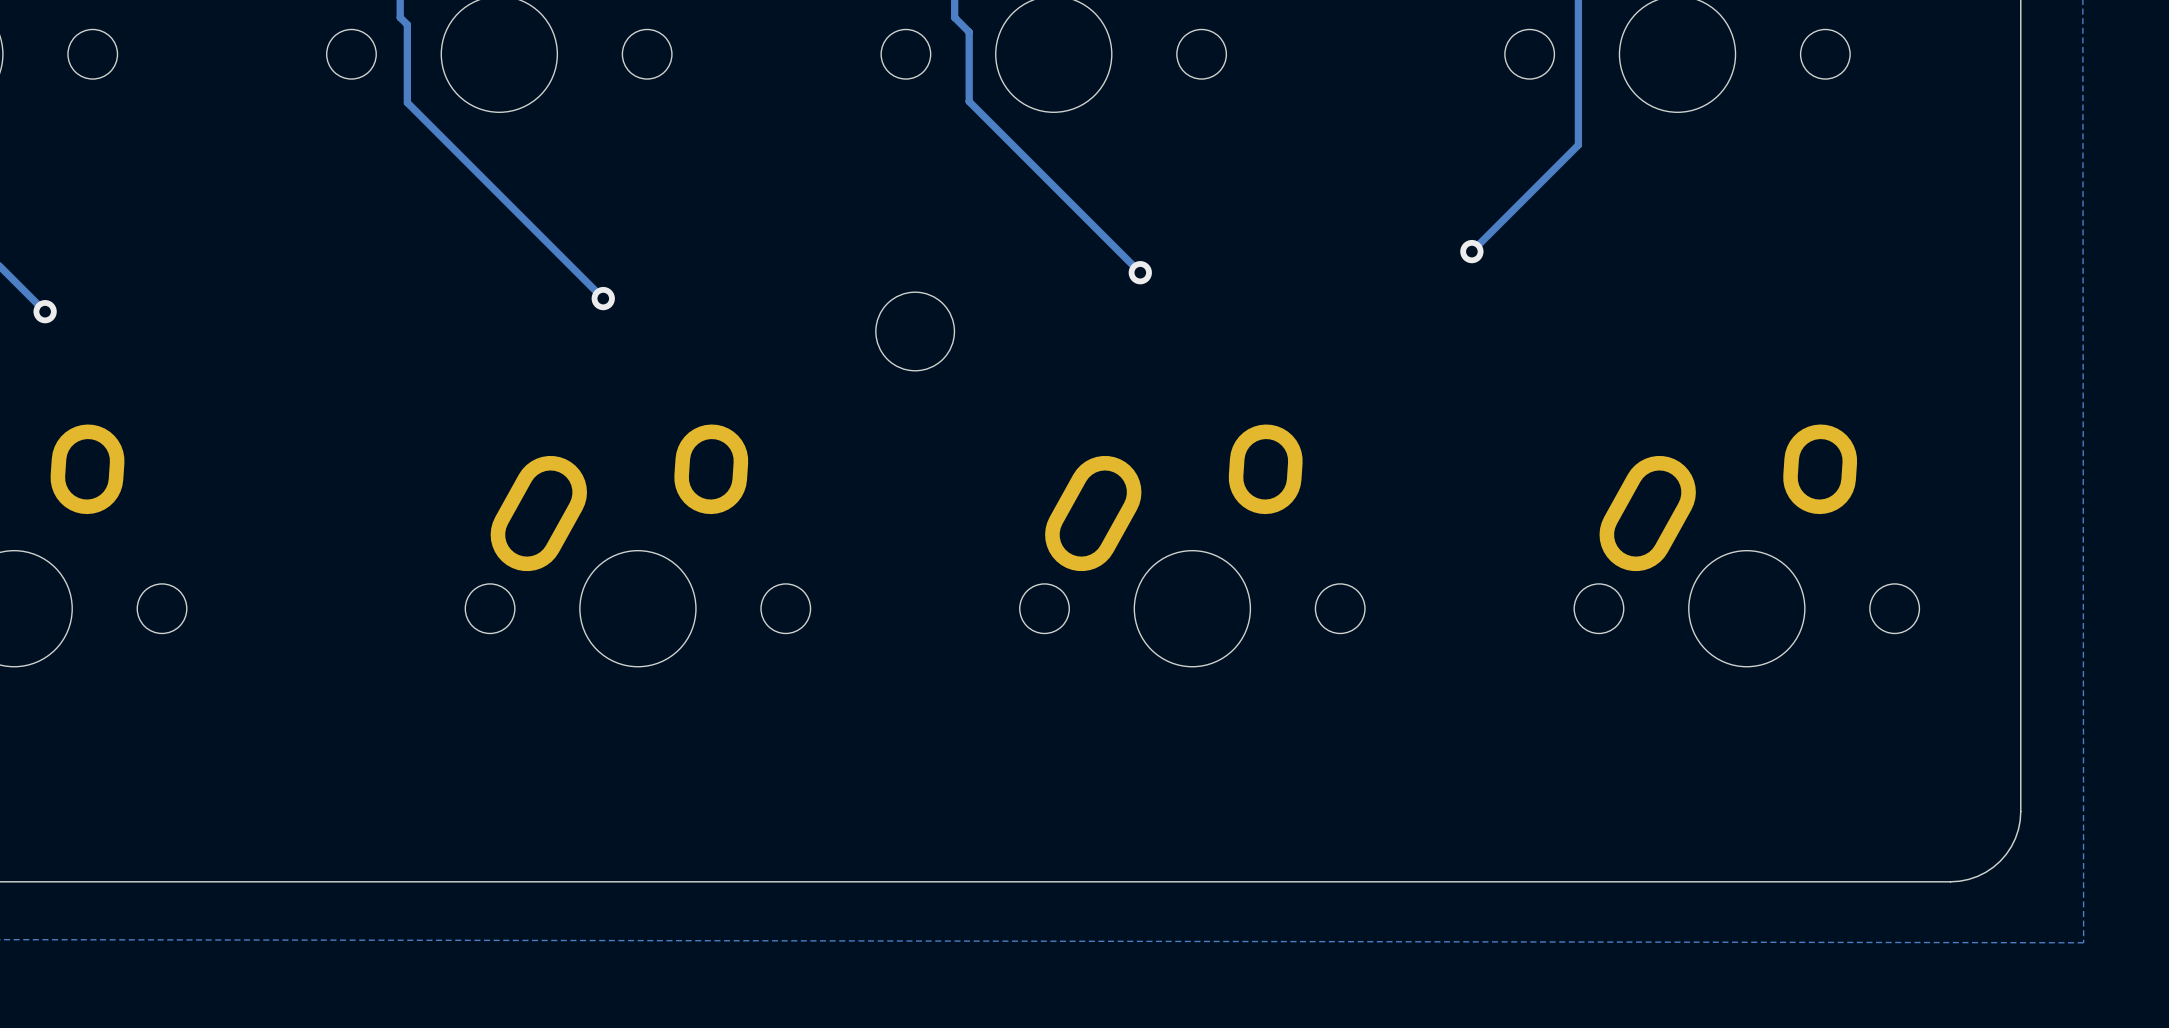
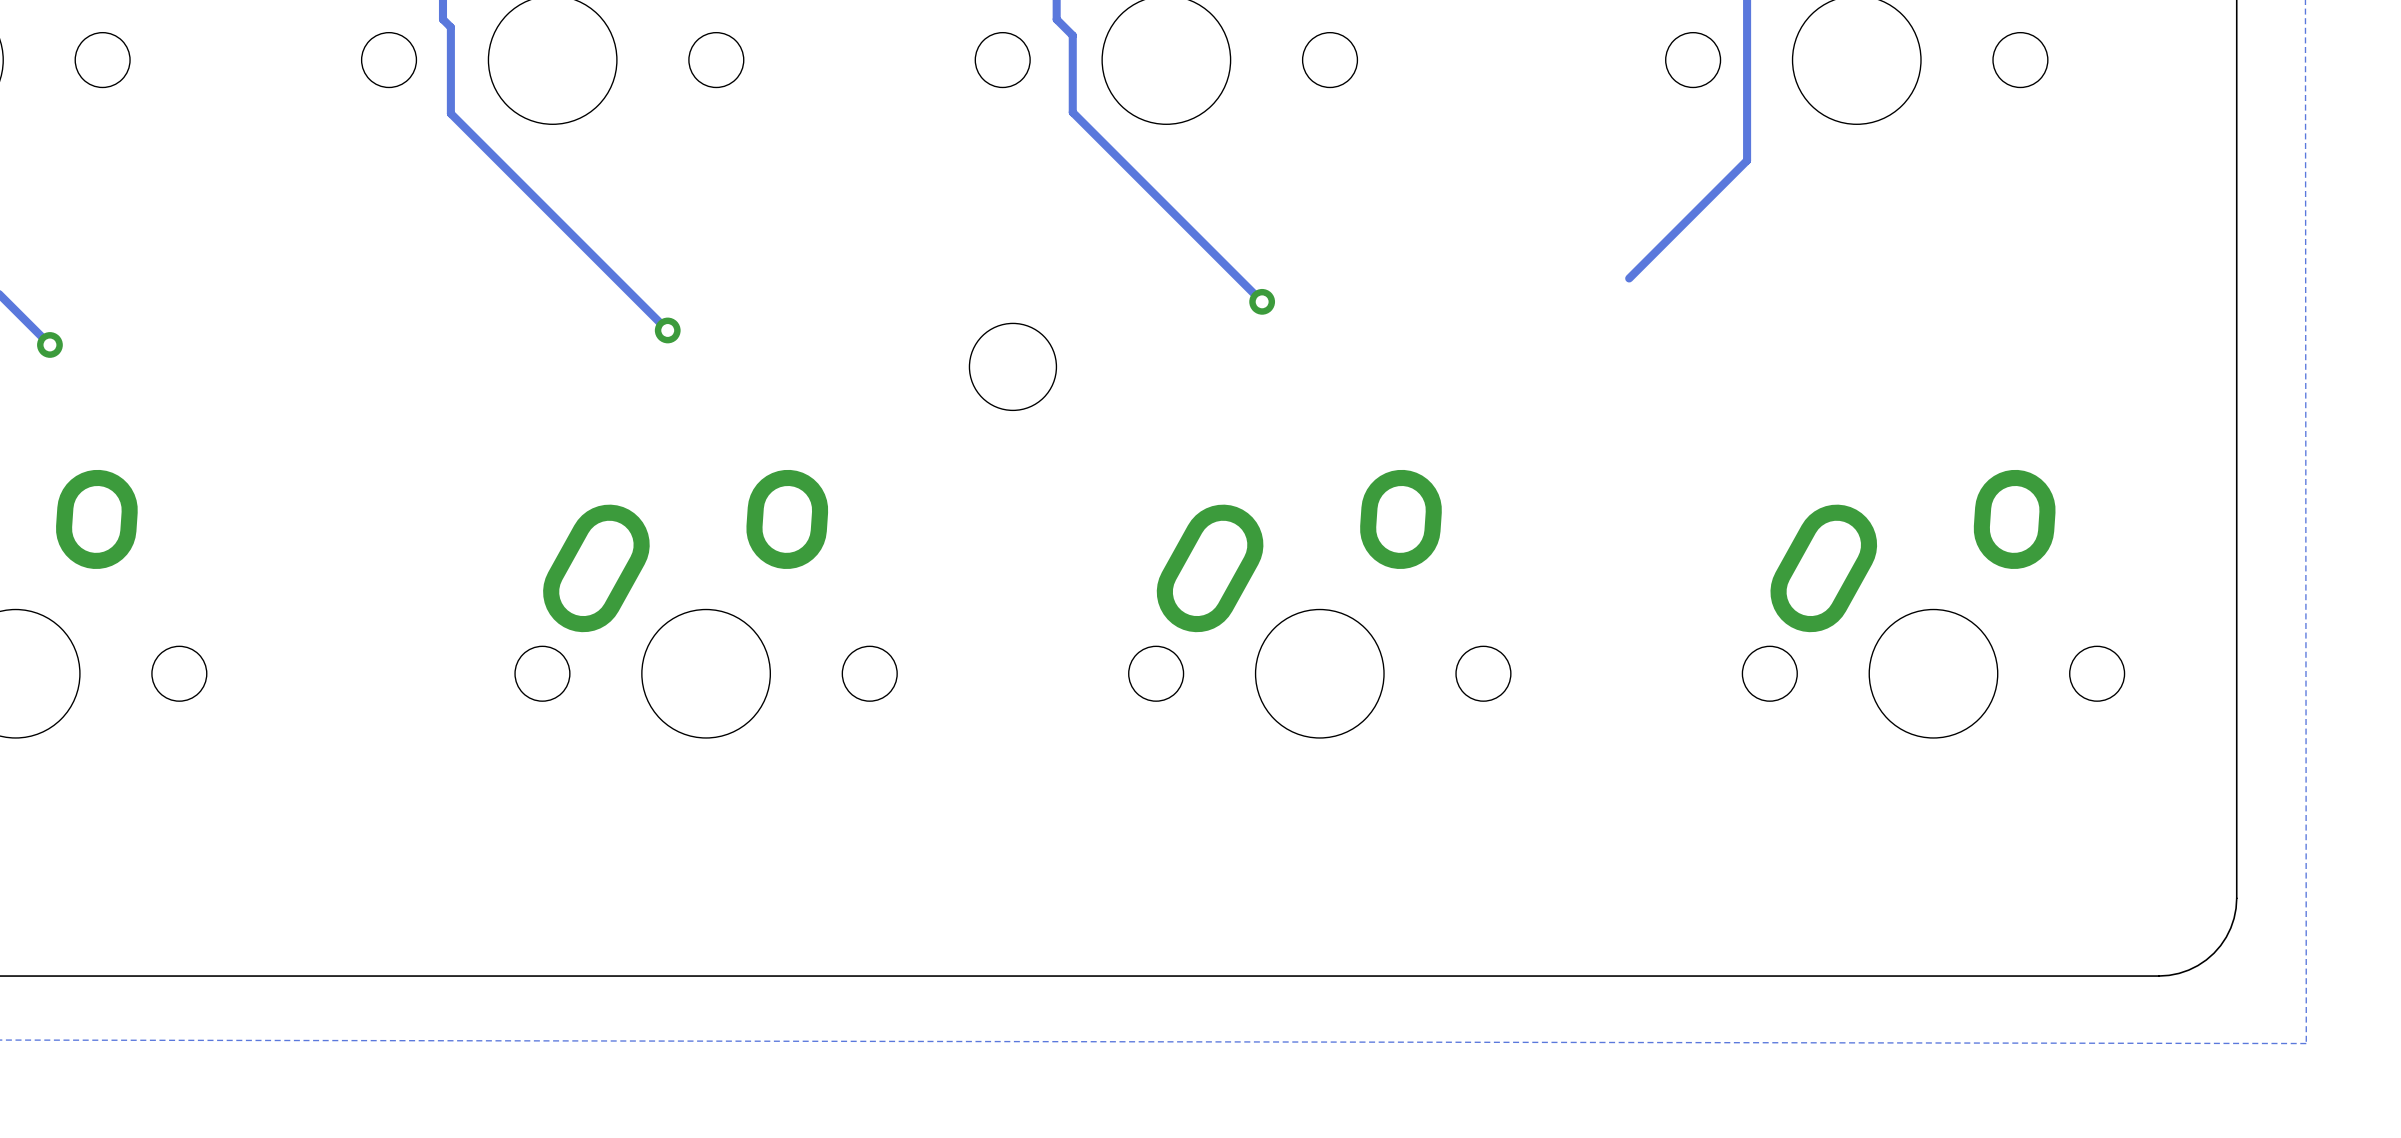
via: (1471, 251) -> none

